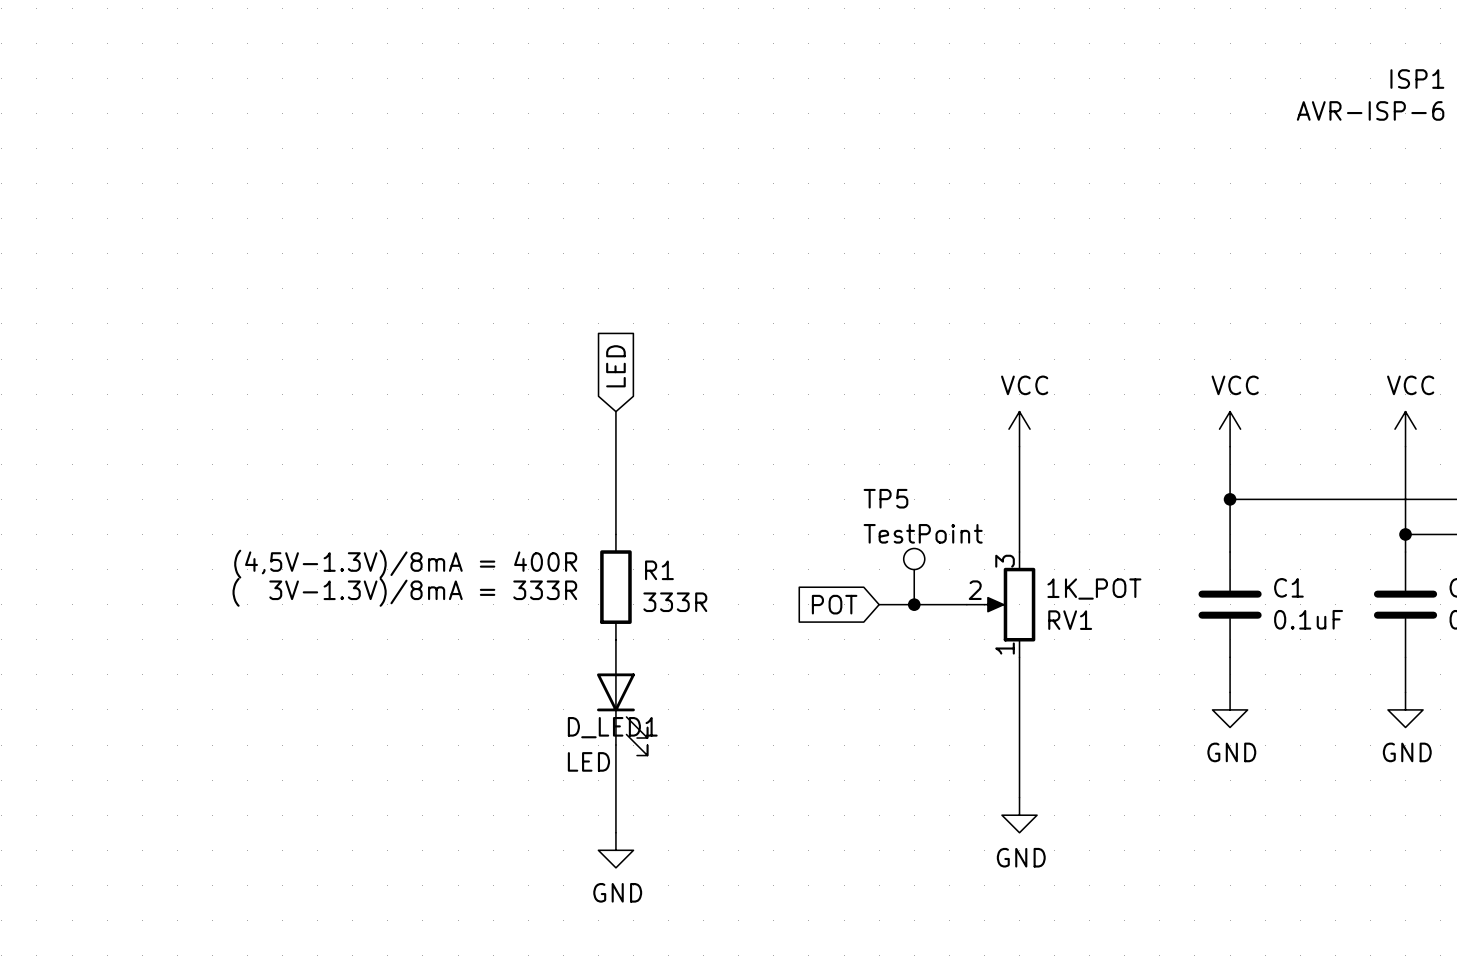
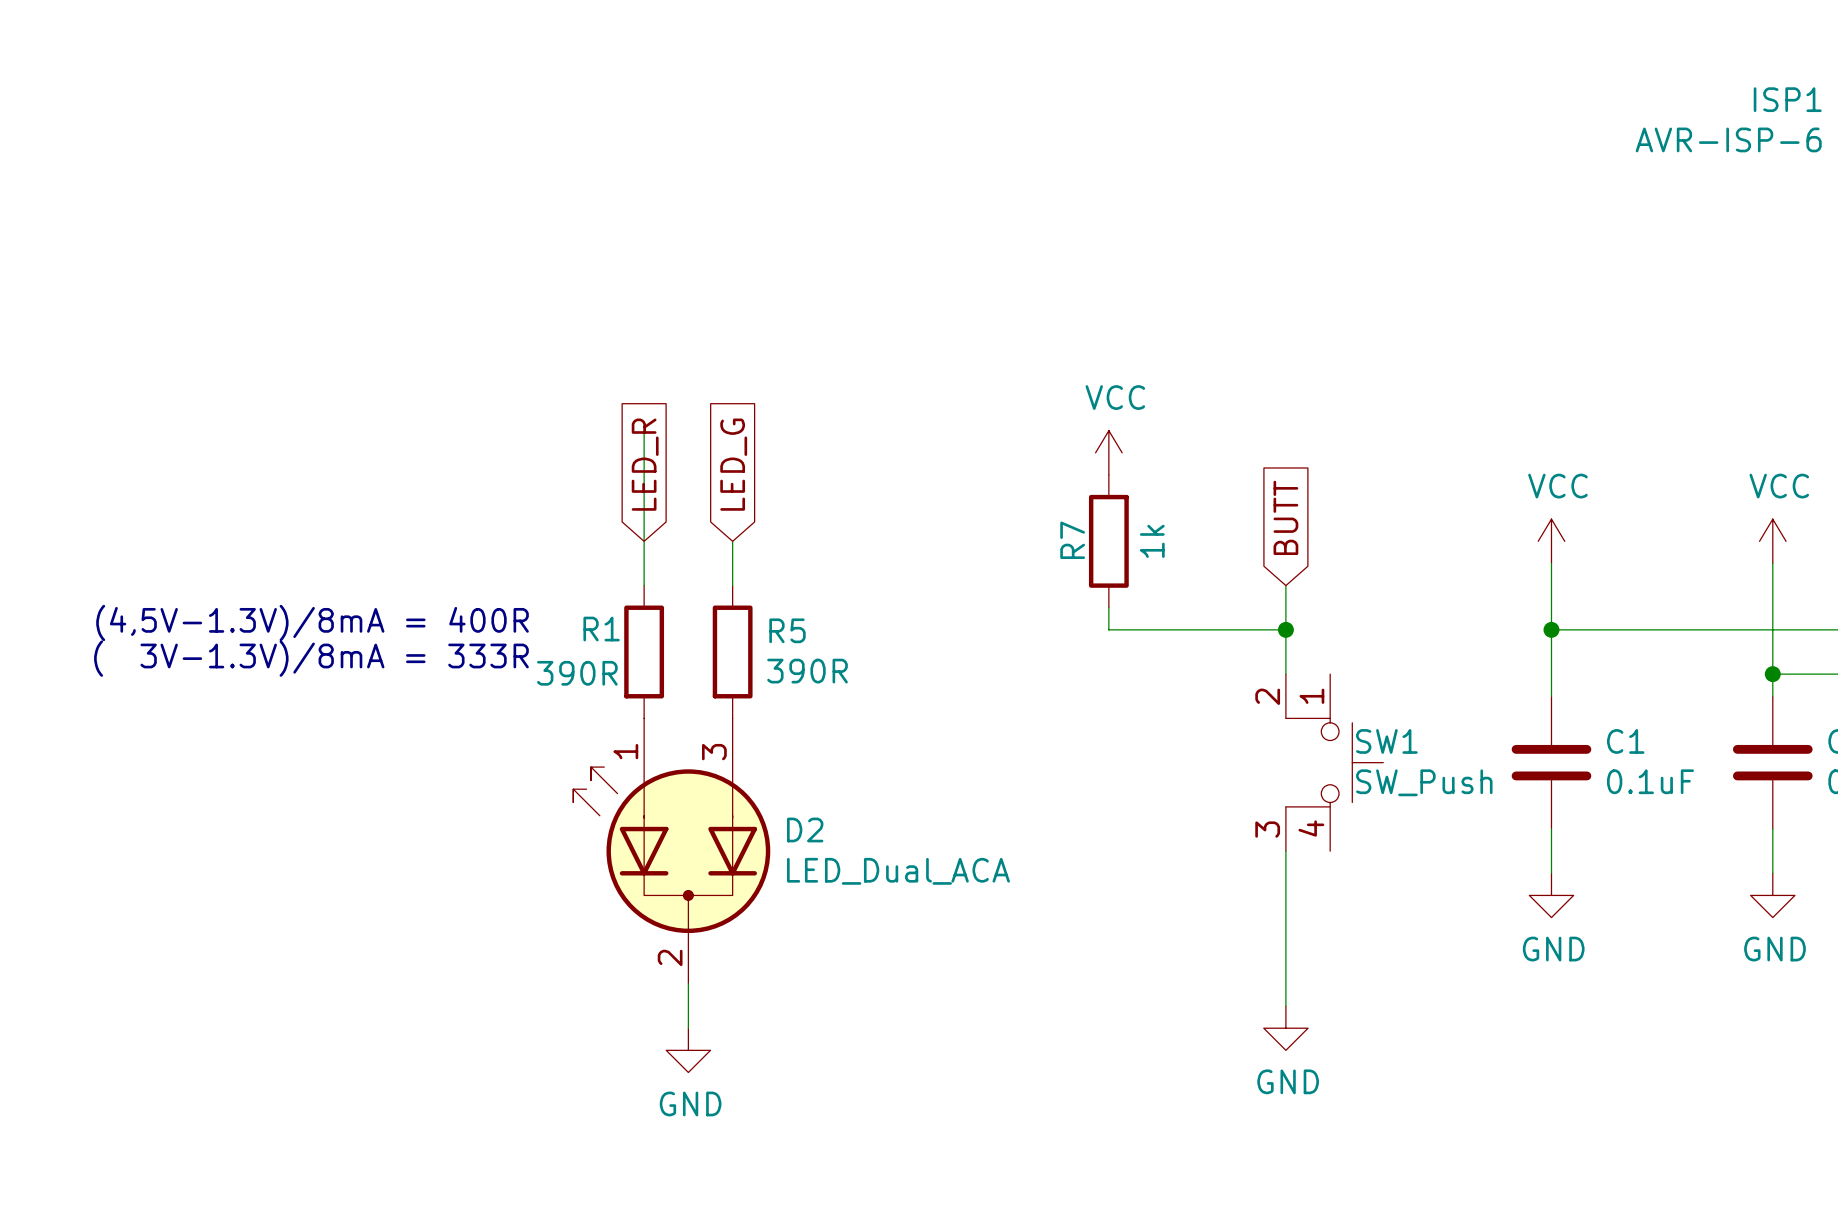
global label: LED (615, 366) -> LED_G (733, 464)
global label: none -> LED_R (645, 464)
global label: none -> BUTT (1285, 517)
wire: (615, 411) (615, 534) -> (644, 430) (644, 585)
wire: none -> (732, 541) (732, 585)
R7: none -> 1k (1108, 541)
power symbol position: VCC (1019, 429) -> VCC (1108, 452)
wire: (1019, 446) (1019, 464) -> none
wire: none -> (1108, 607) (1108, 629) (1285, 629)
junction: none -> (1285, 629)
R5: none -> 390R (732, 651)
text position: (4,5V-1.3V)/8mA = 400R (405, 564) -> (4,5V-1.3V)/8mA = 400R (312, 623)
R1 name position: R1 (659, 570) -> R1 (601, 629)
TP5: TestPoint (914, 576) -> none
R1 position: (615, 587) -> (644, 651)
text position: ( 3V-1.3V)/8mA = 333R (404, 592) -> ( 3V-1.3V)/8mA = 333R (311, 658)
R1 value: 333R (675, 602) -> 390R (577, 673)
global label: POT (834, 604) -> none
wire: (879, 604) (966, 604) -> none
junction: (914, 604) -> none
RV1: 1K_POT (1001, 604) -> none
SW1: none -> SW_Push (1334, 762)
D2: none -> LED_Dual_ACA (671, 851)
D_LED1: LED (622, 697) -> none
wire: (615, 745) (615, 832) -> none
wire: none -> (688, 983) (688, 1028)
power symbol position: GND (615, 850) -> GND (688, 1050)

